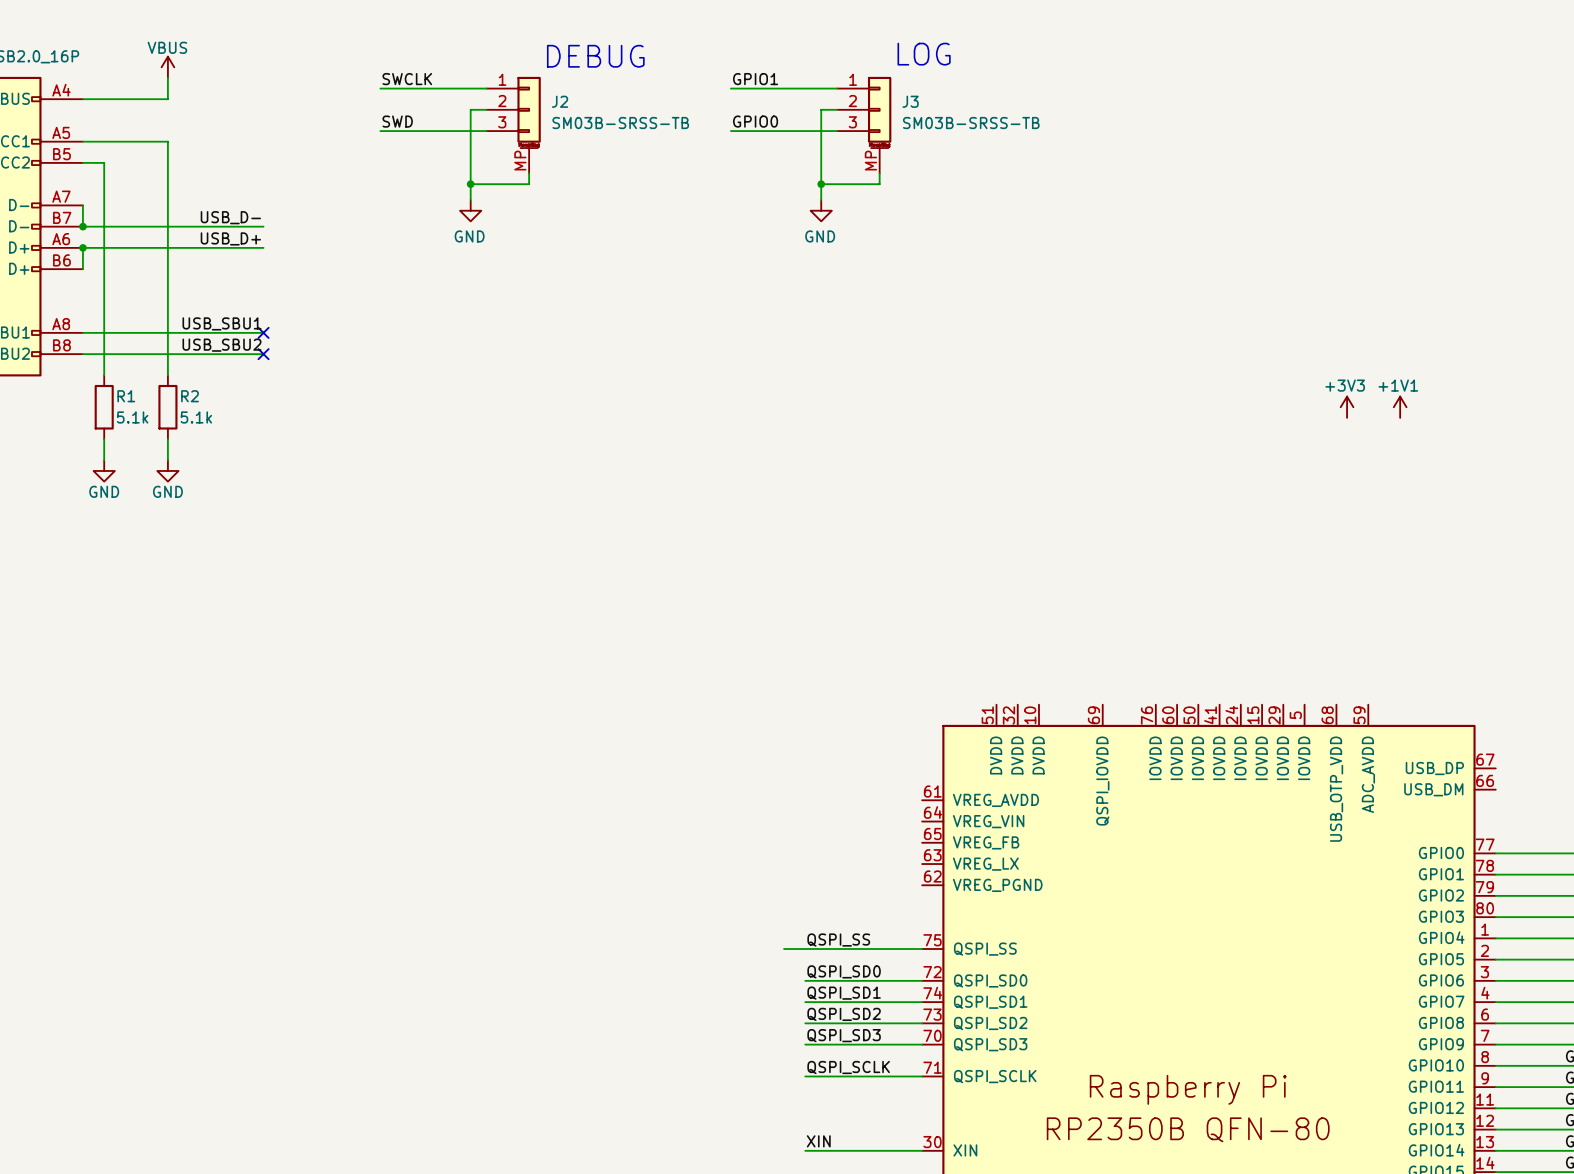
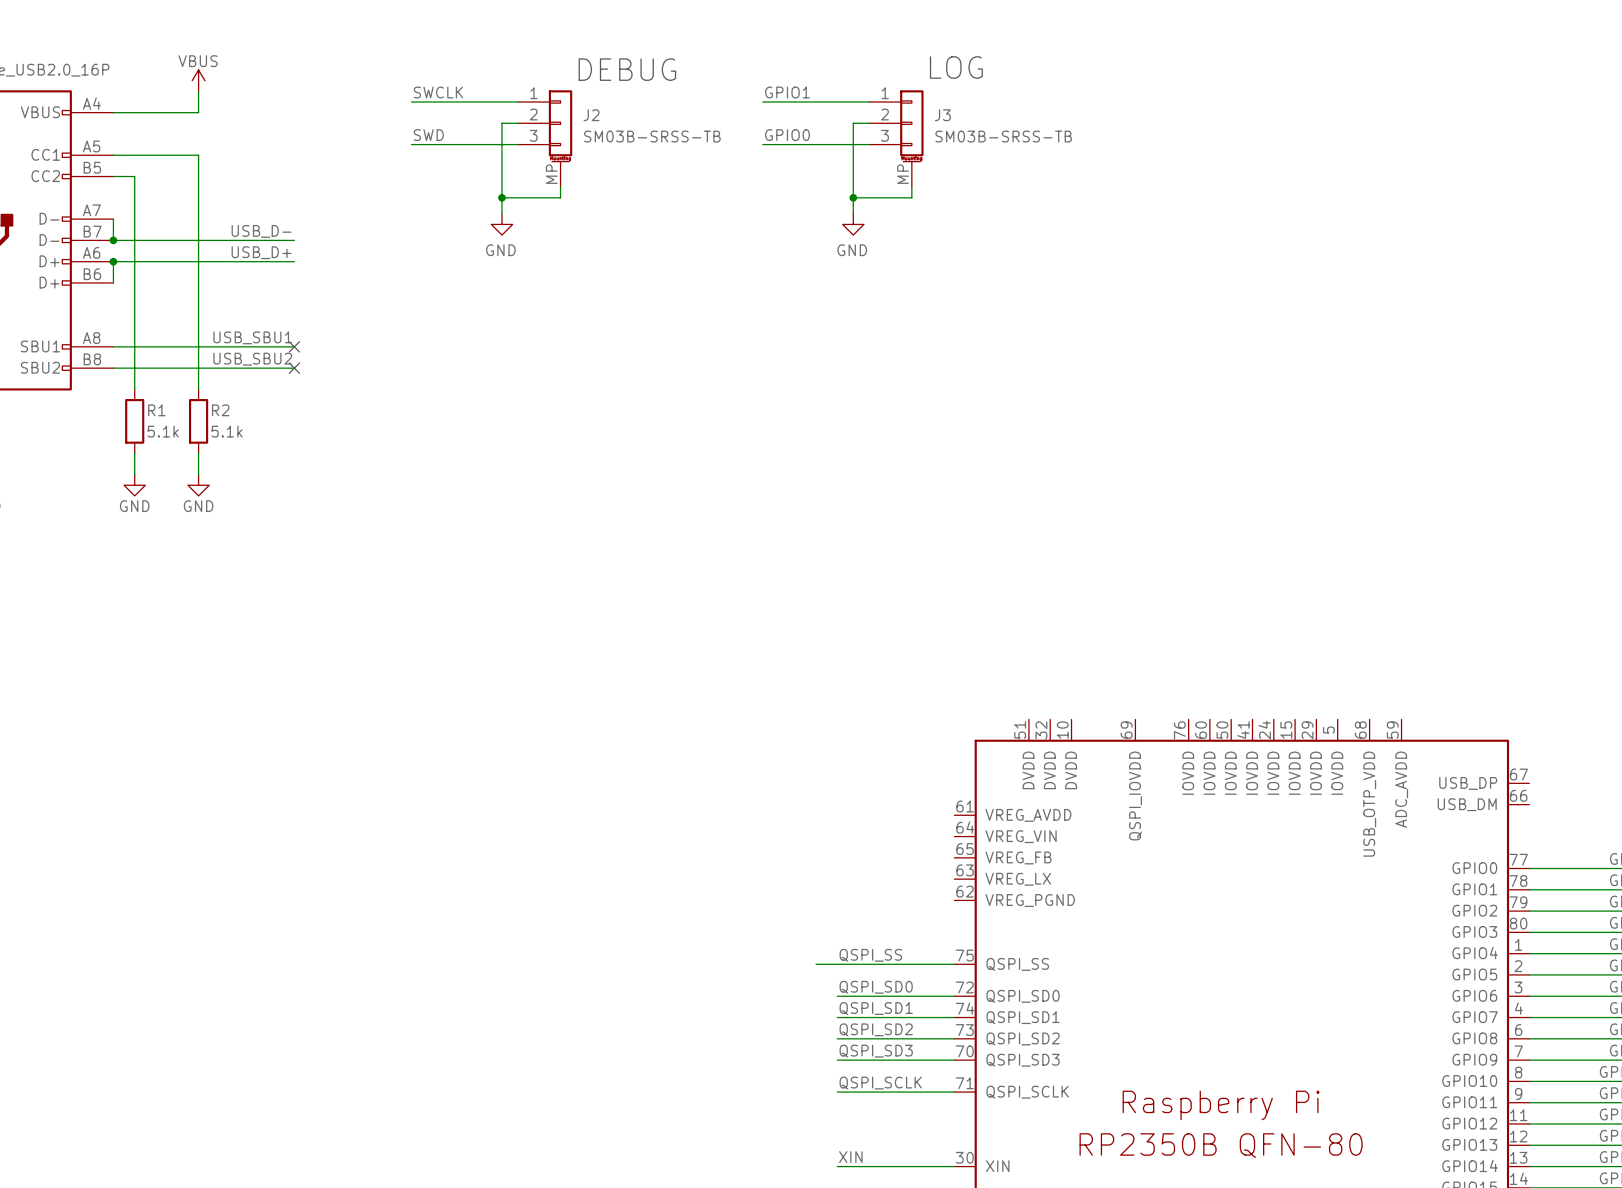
power symbol: +3V3 (1347, 407) -> none
power symbol: +1V1 (1400, 407) -> none

